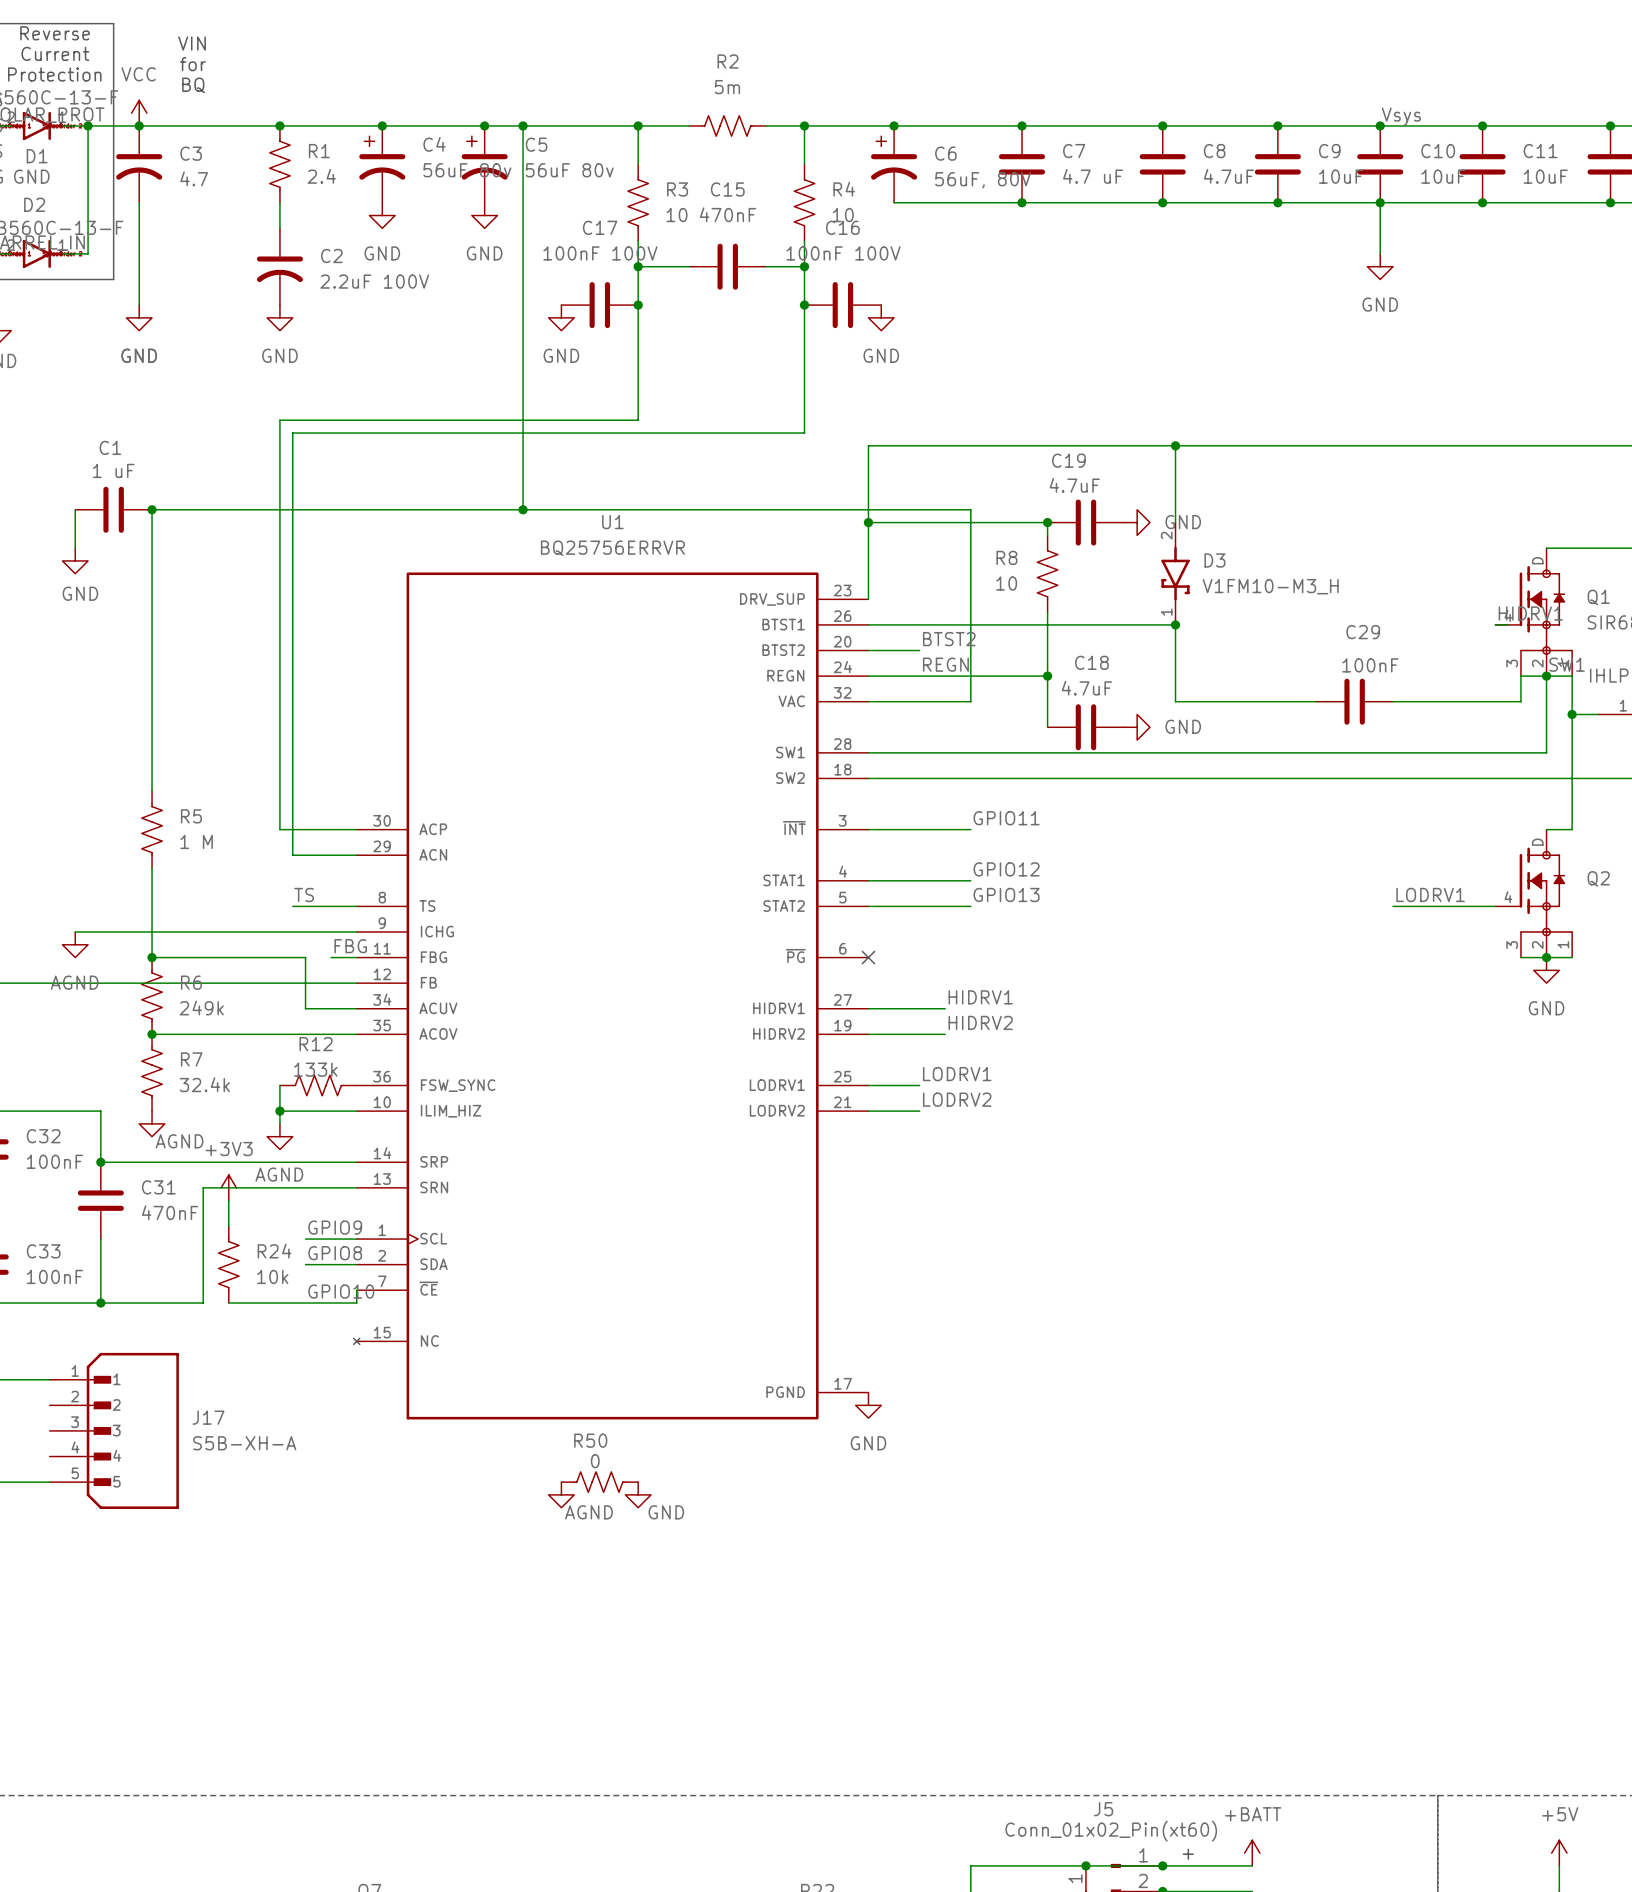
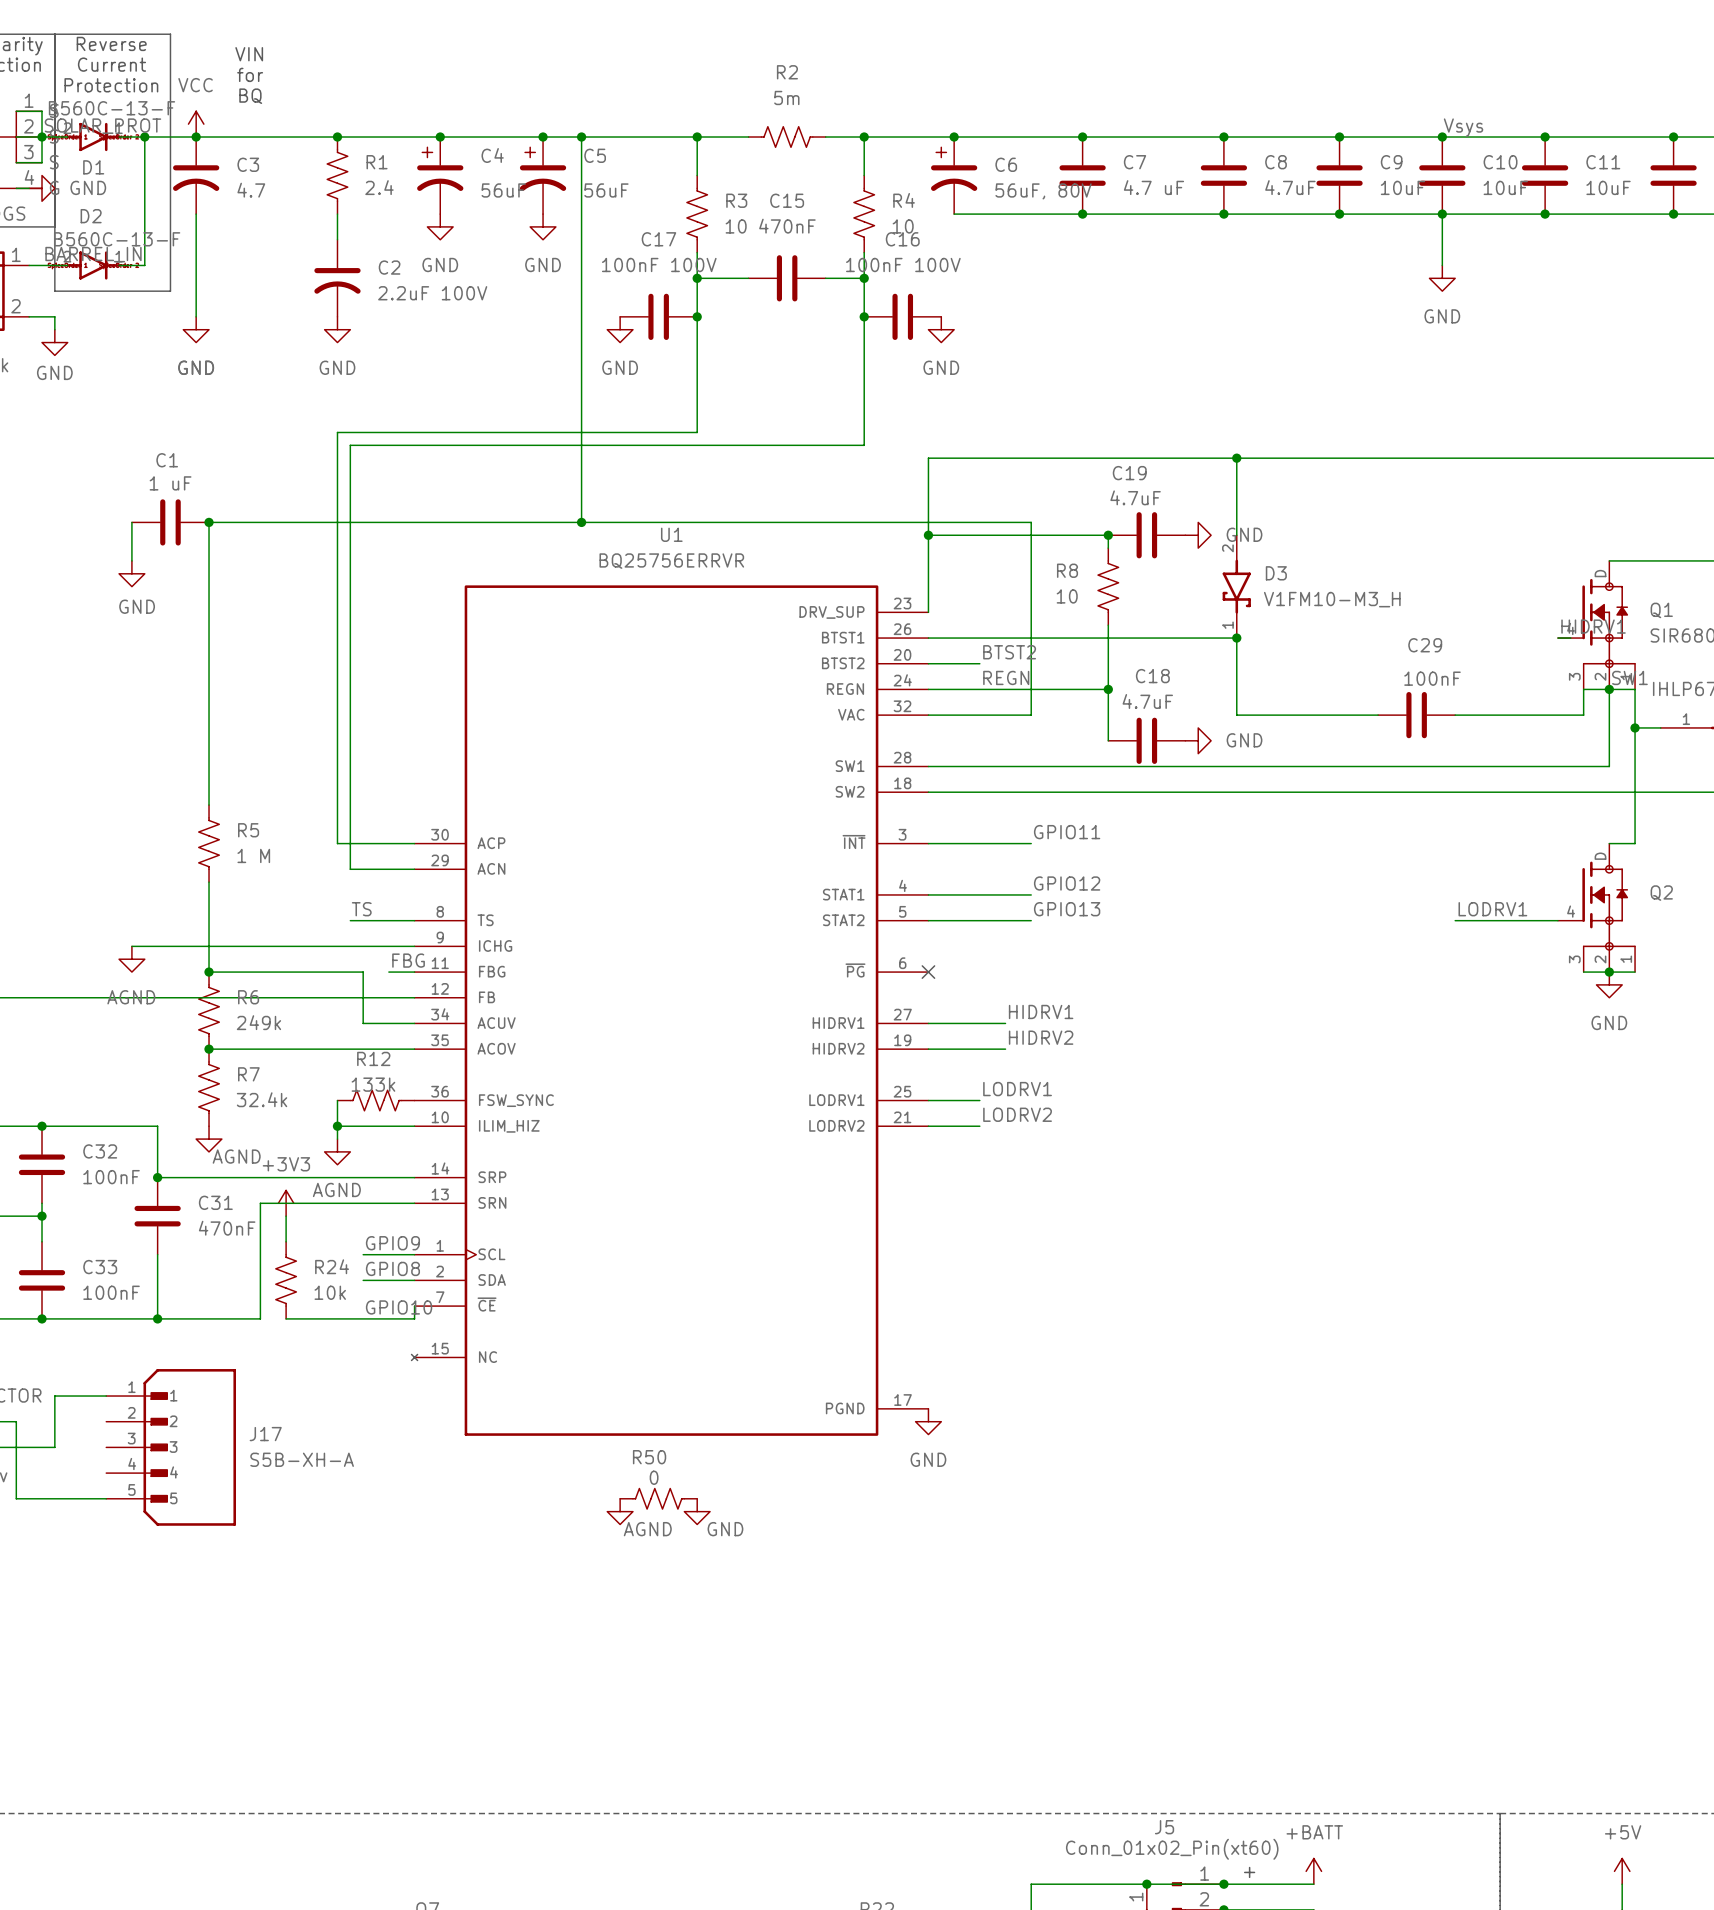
C4 value: 56uF 80v (467, 170) -> 56uF (503, 190)
C5 value: 56uF 80v (569, 170) -> 56uF (606, 190)

